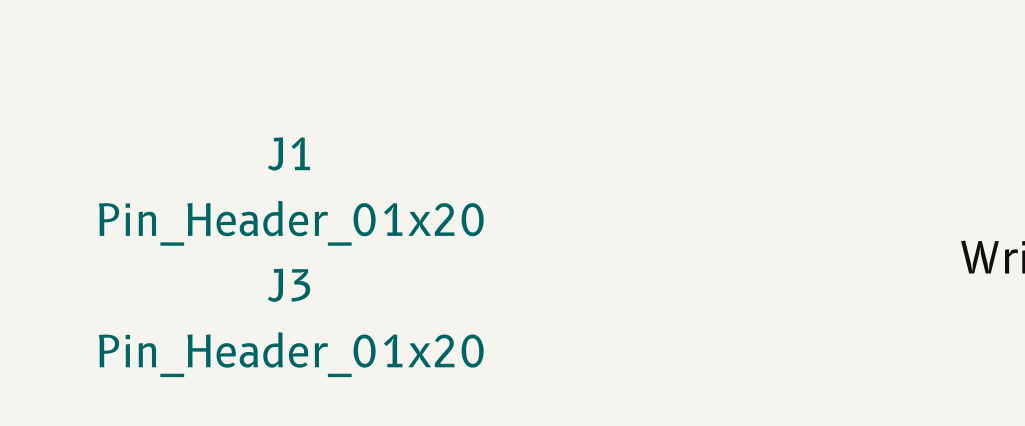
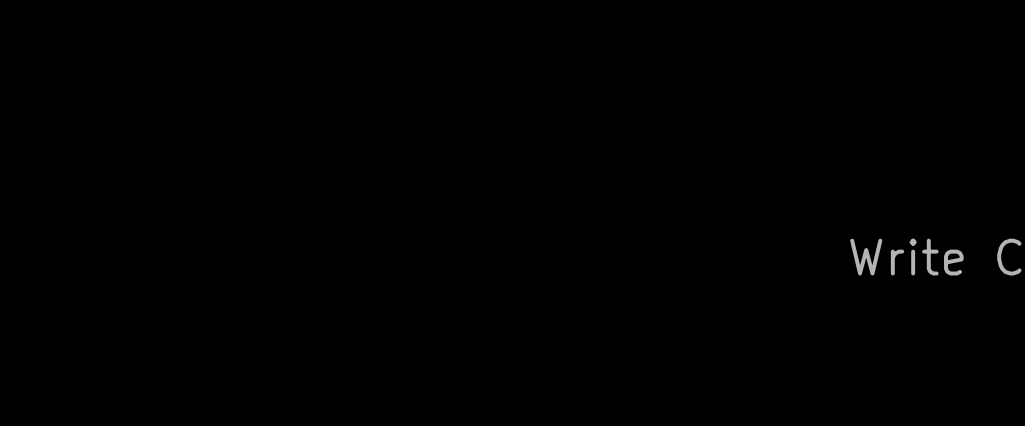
J1: Pin_Header_01x20 (291, 191) -> none
J3: Pin_Header_01x20 (291, 322) -> none

